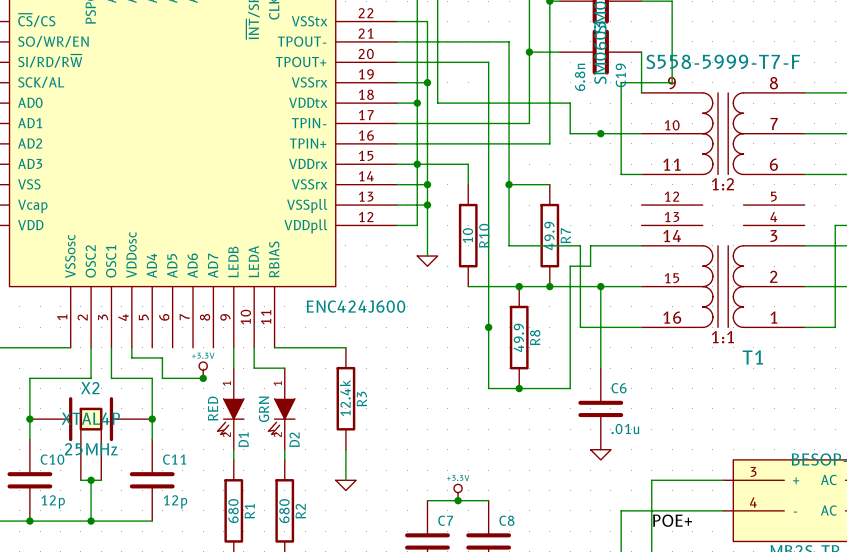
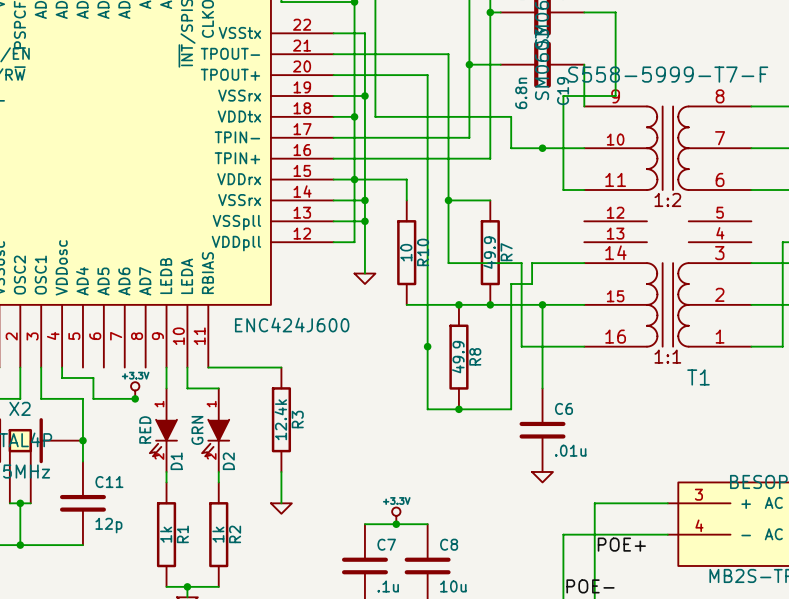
R1 value: 680 (233, 511) -> 1k (166, 534)
R2 value: 680 (284, 511) -> 1k (218, 534)

